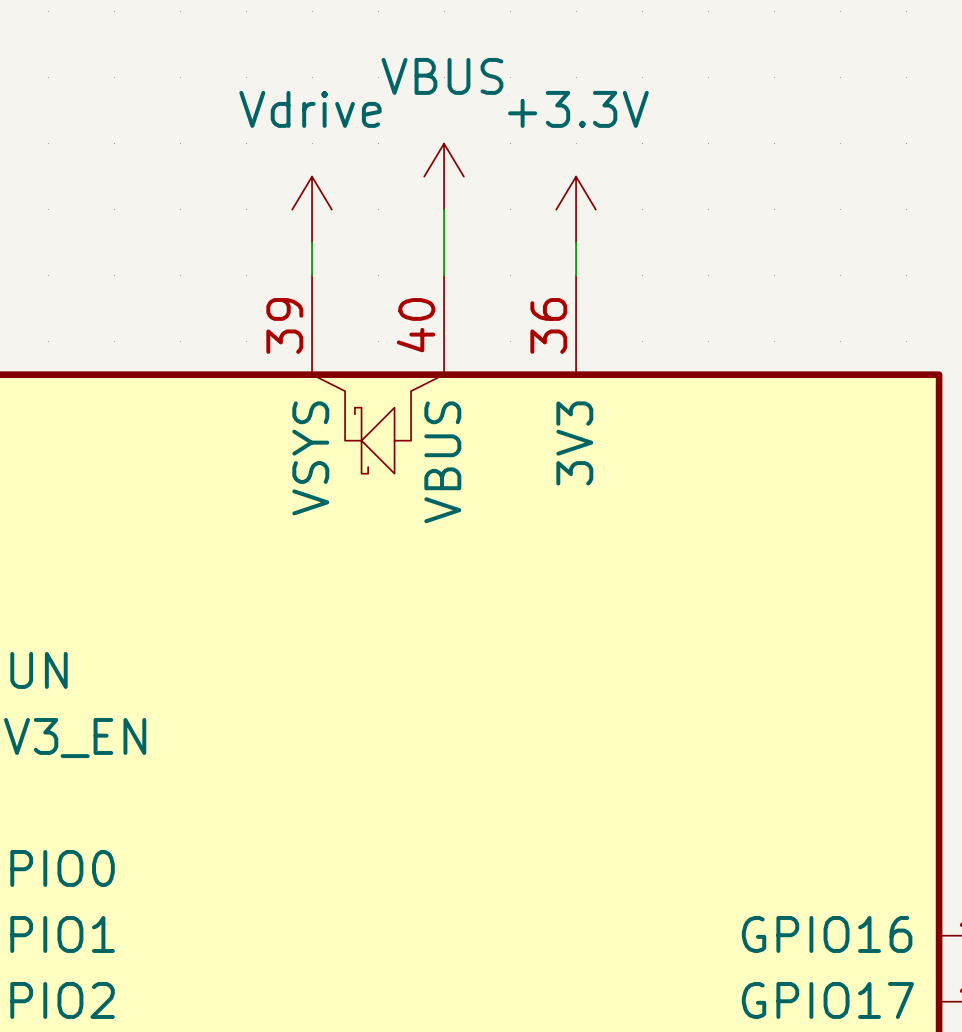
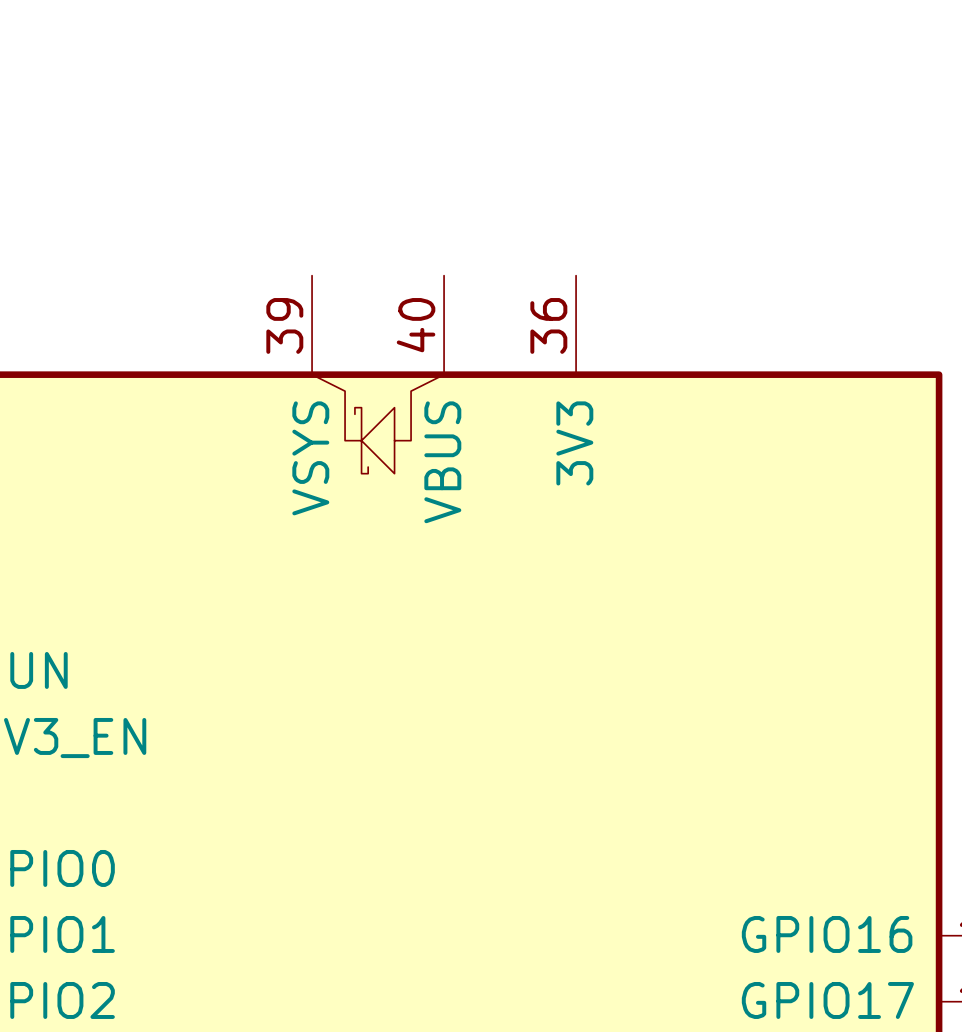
power symbol: VBUS (444, 176) -> none
power symbol: Vdrive (312, 209) -> none
wire: (444, 209) (444, 275) -> none
power symbol: +3.3V (576, 209) -> none
wire: (312, 242) (312, 275) -> none
wire: (576, 242) (576, 275) -> none

